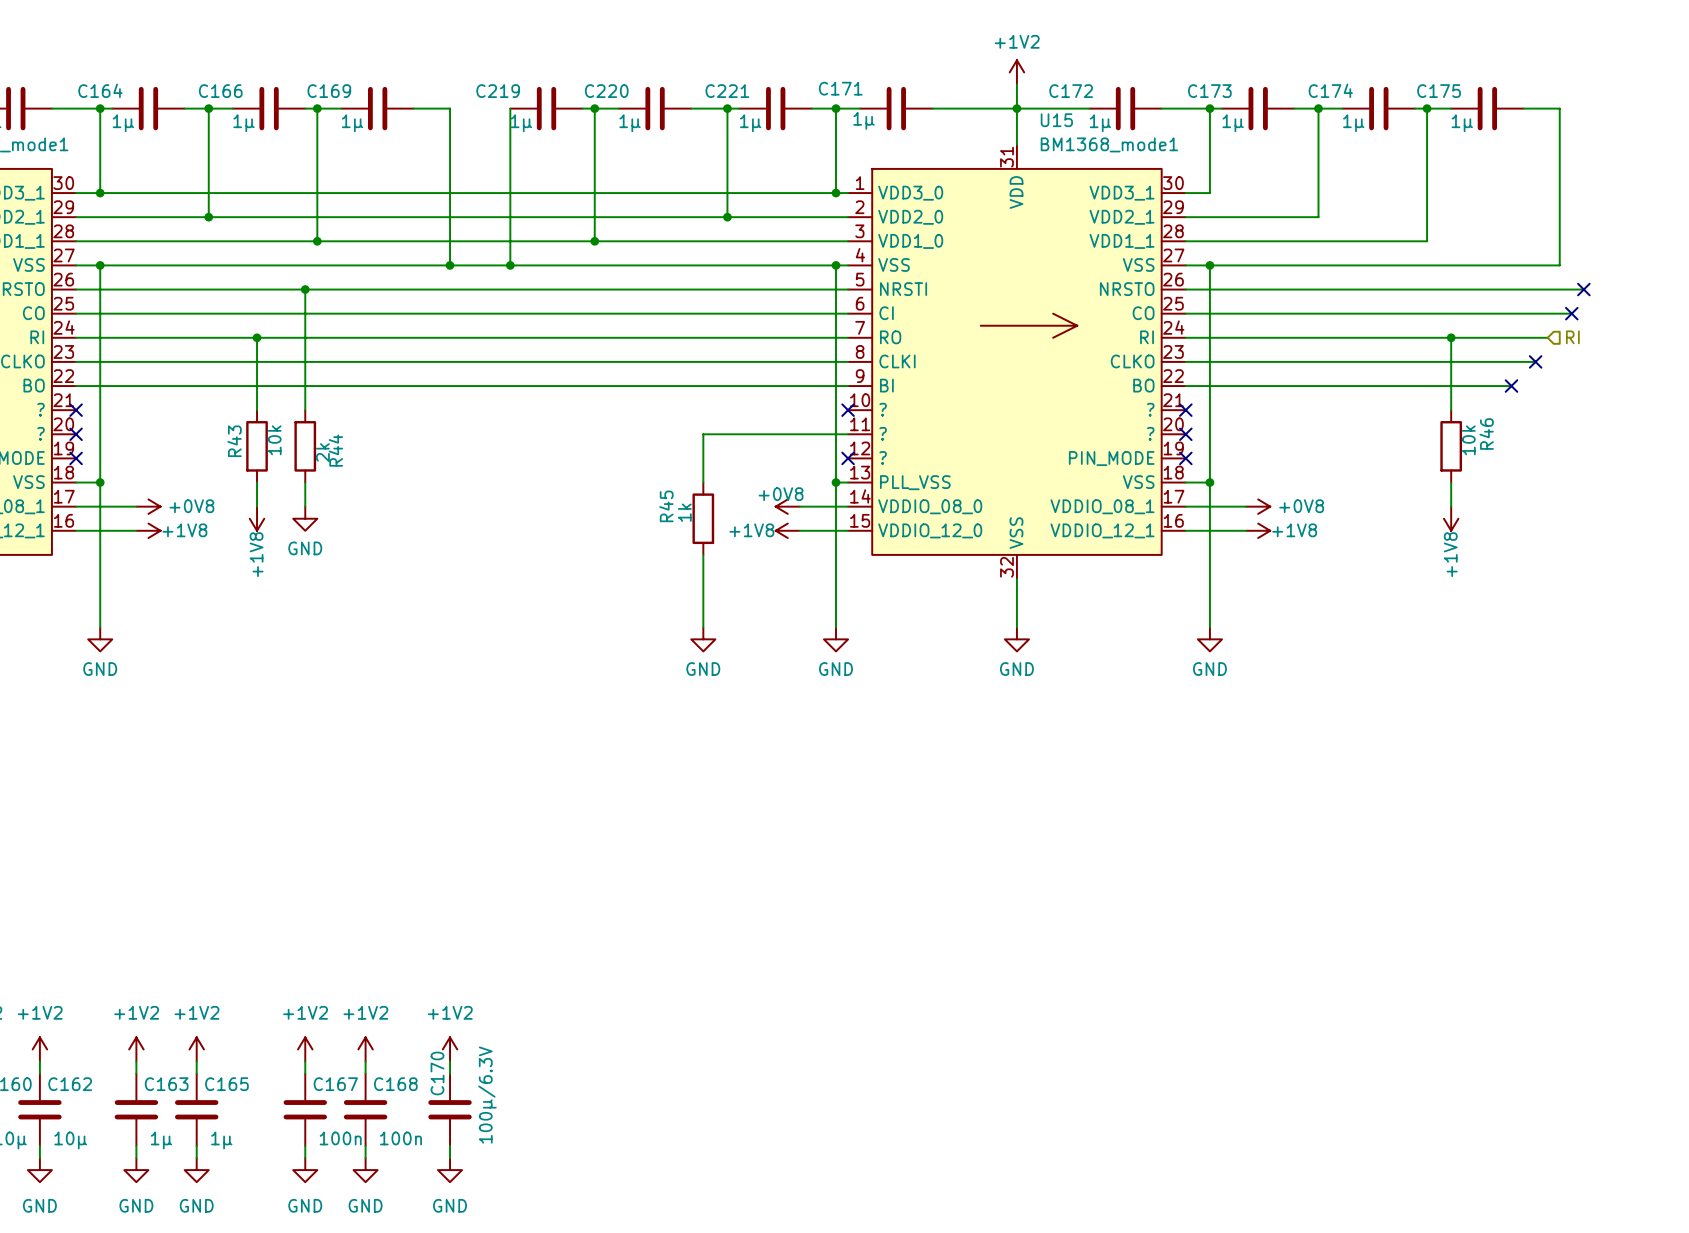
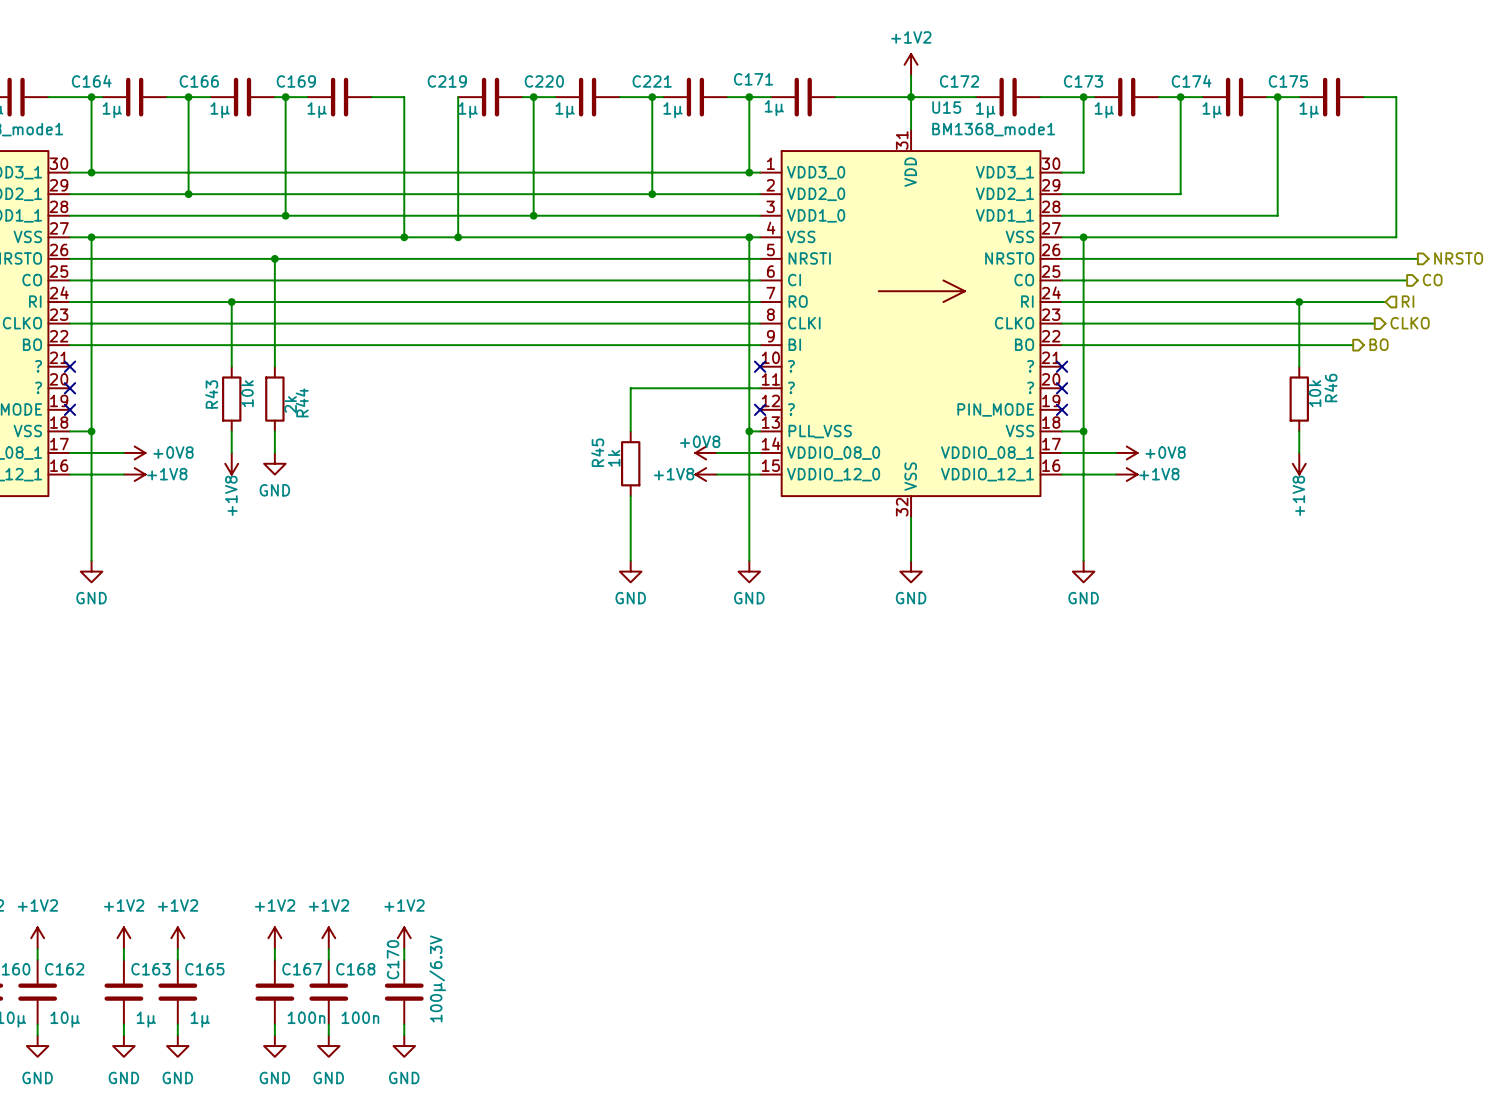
no-connect mark: (1583, 289) -> none
hierarchical label: none -> NRSTO (1458, 258)
no-connect mark: (1571, 313) -> none
hierarchical label: none -> CO (1432, 280)
no-connect mark: (1535, 361) -> none
hierarchical label: none -> CLKO (1410, 323)
hierarchical label: none -> BO (1379, 344)
no-connect mark: (1511, 386) -> none

